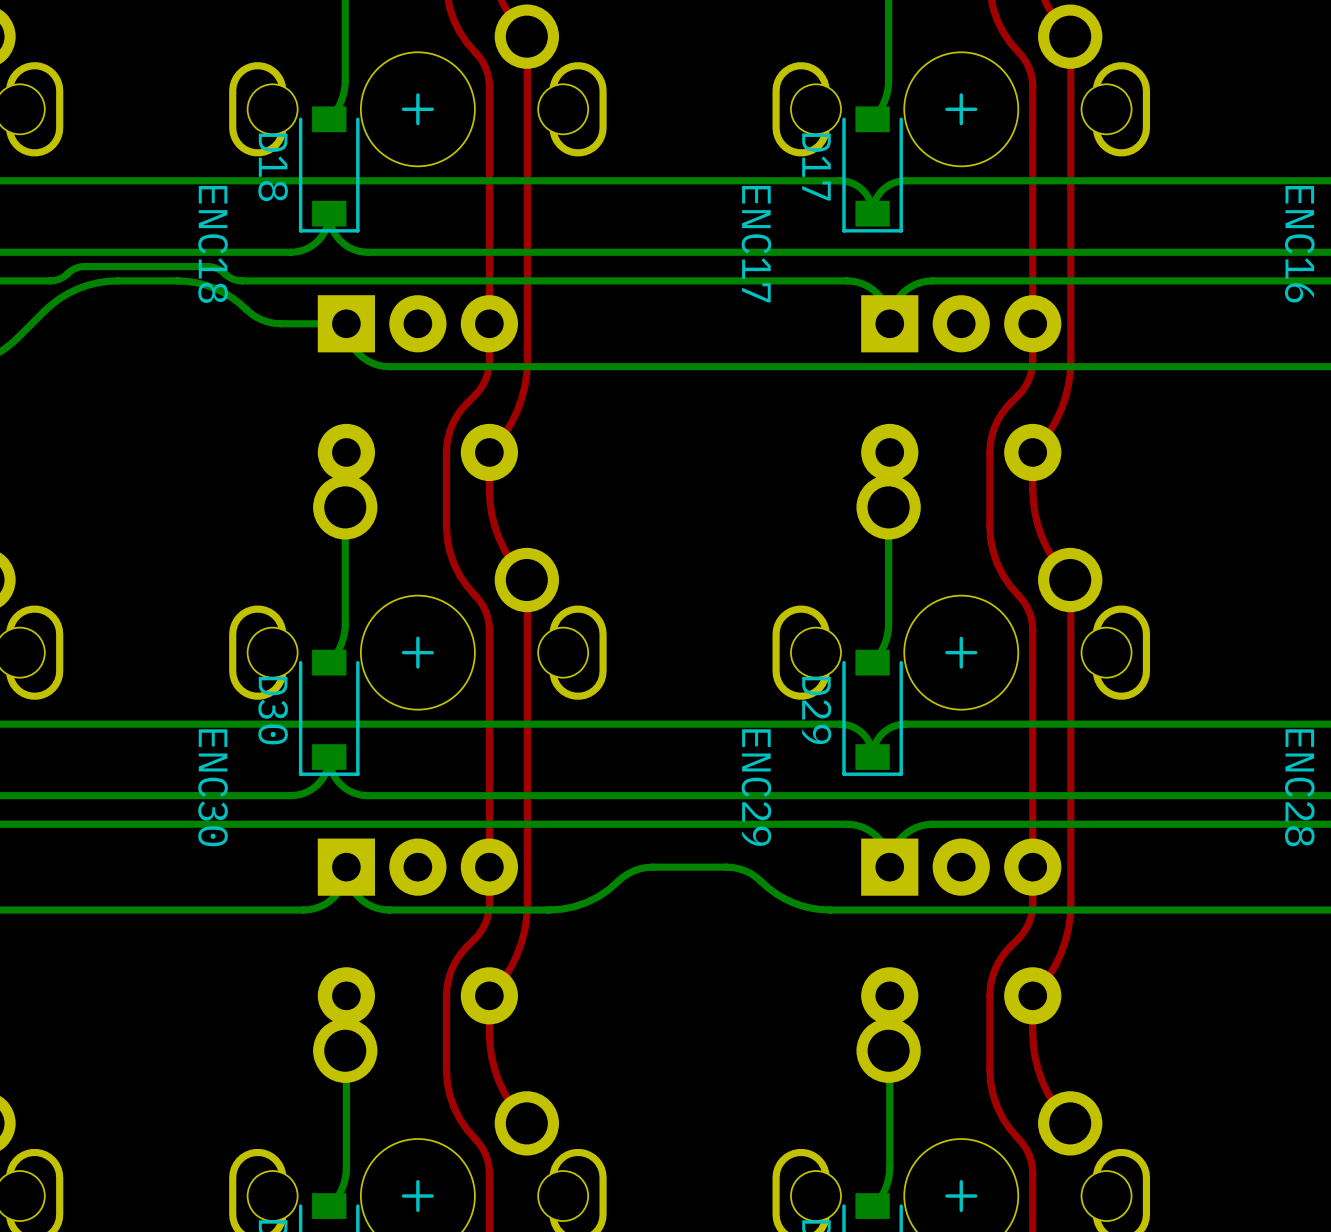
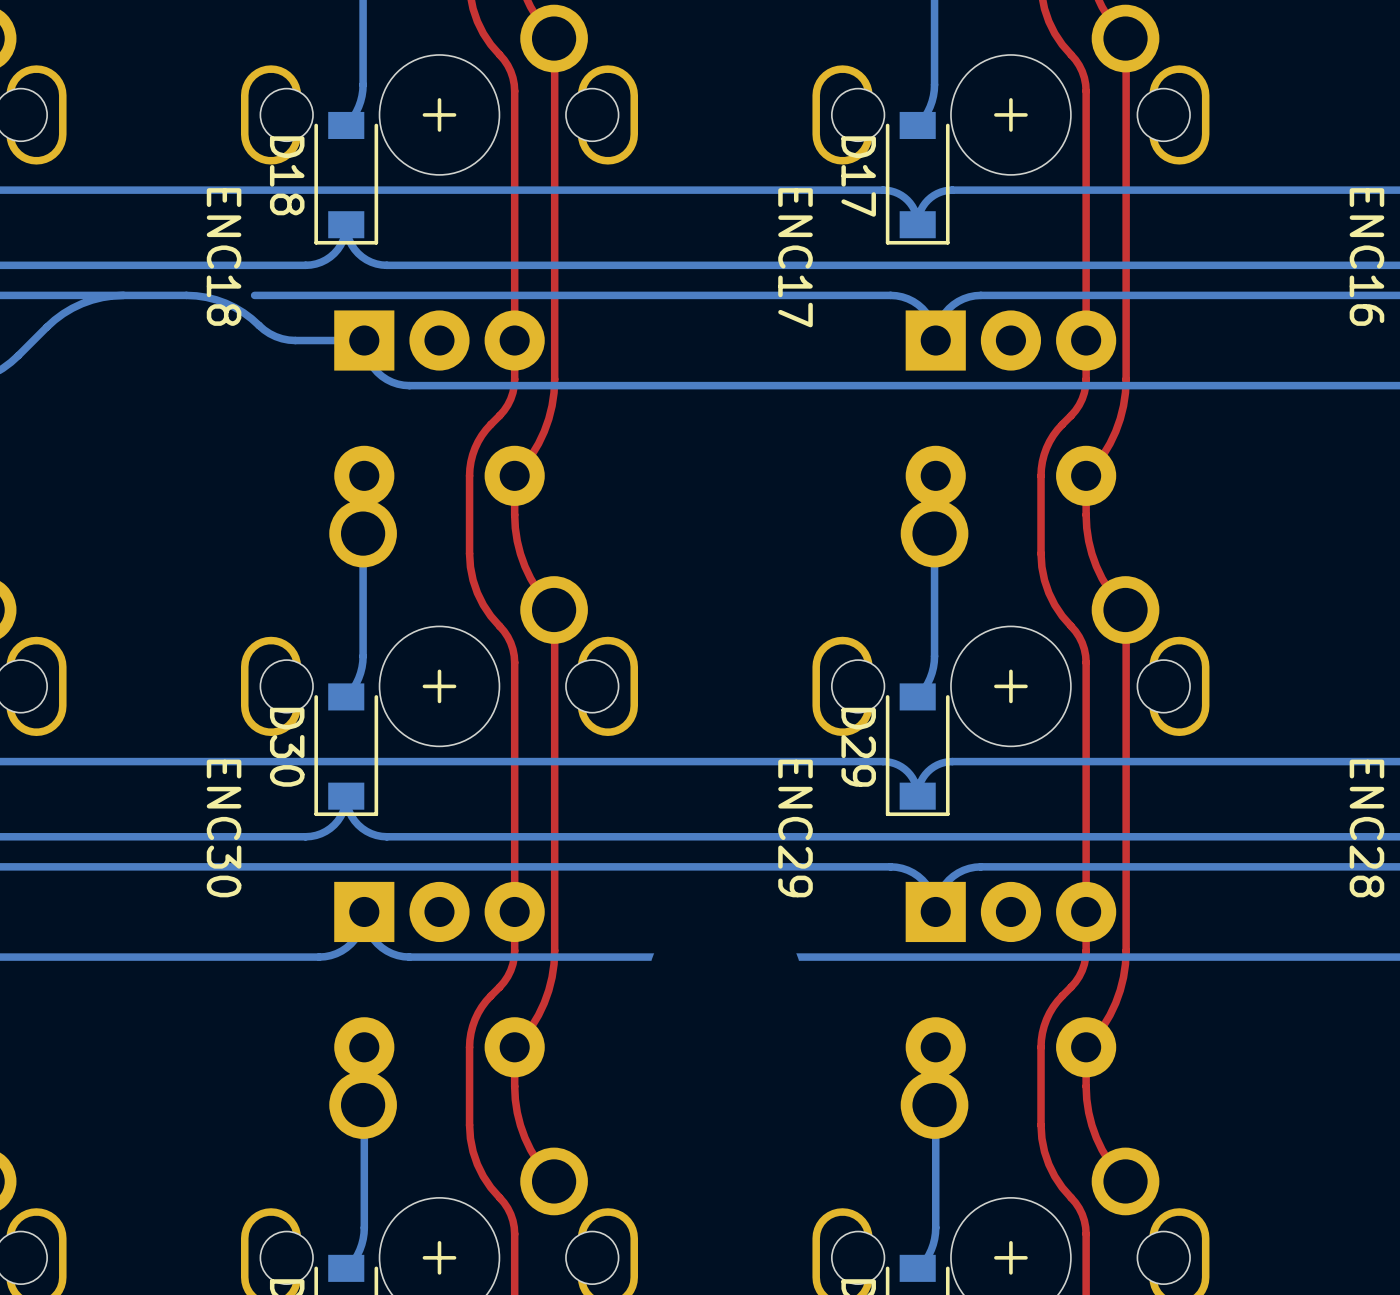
bottom track: (242, 280) (232, 279) (219, 269) (207, 266) (82, 266) (73, 269) (59, 279) (50, 280) -> (123, 295) (52, 295)
bottom track: (830, 910) (811, 908) (792, 902) (775, 893) (750, 873) (739, 868) (726, 867) (639, 868) (628, 873) (608, 889) (586, 902) (574, 906) (549, 910) -> (873, 957) (577, 957)

